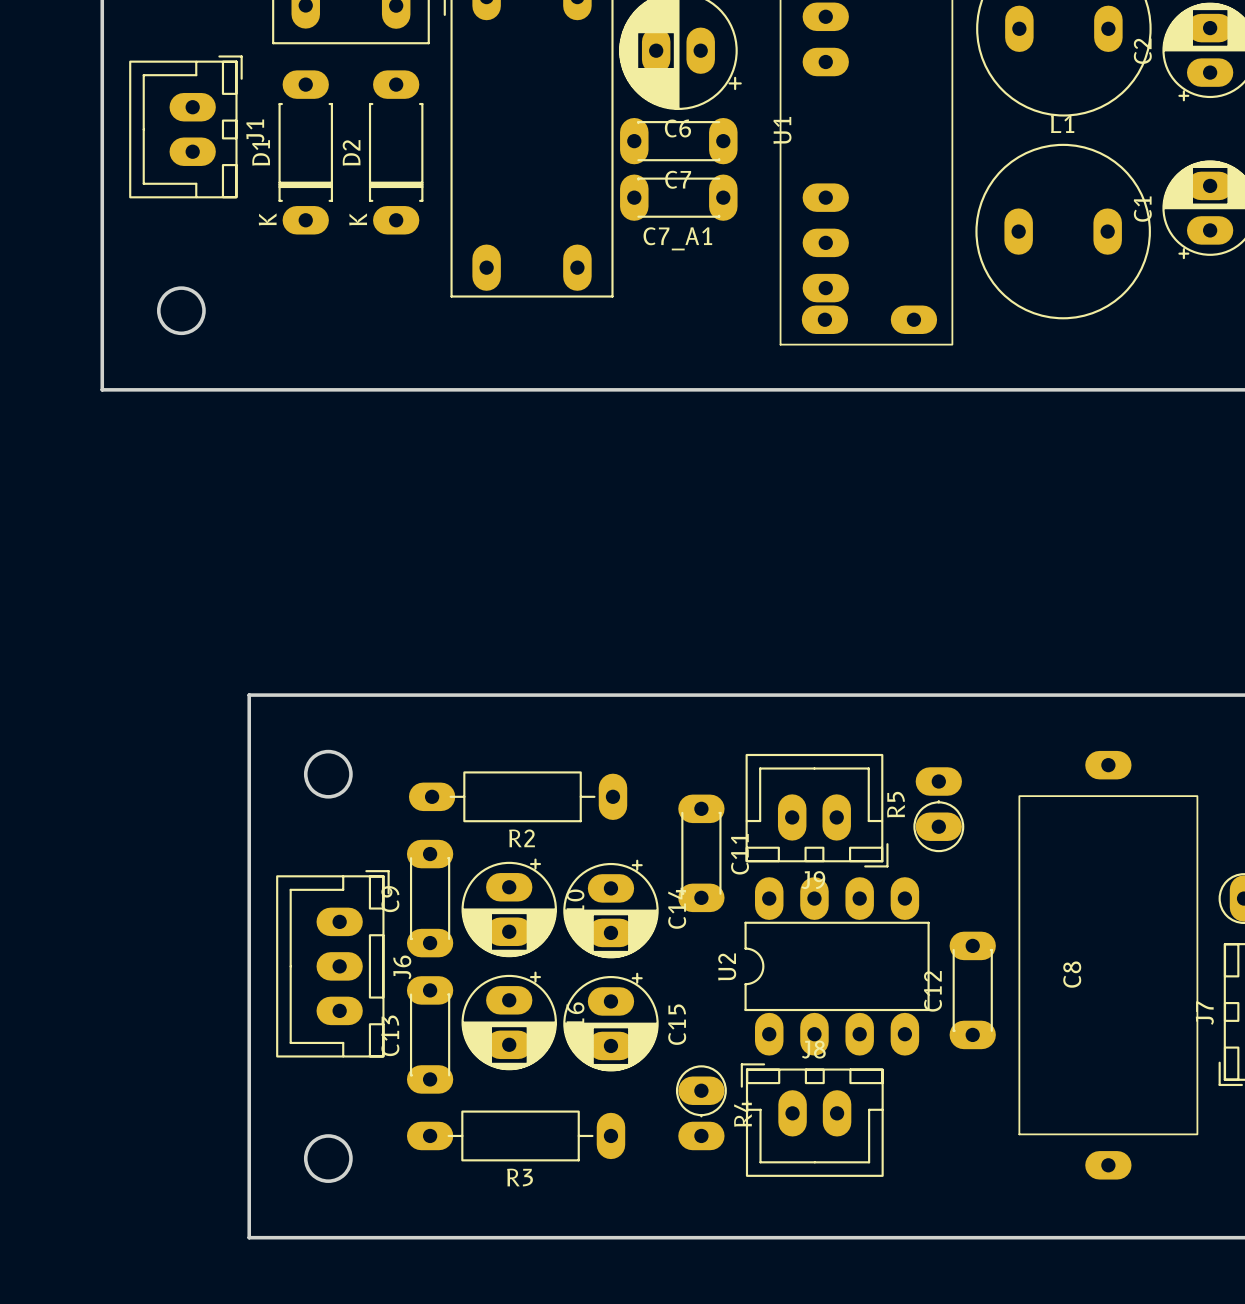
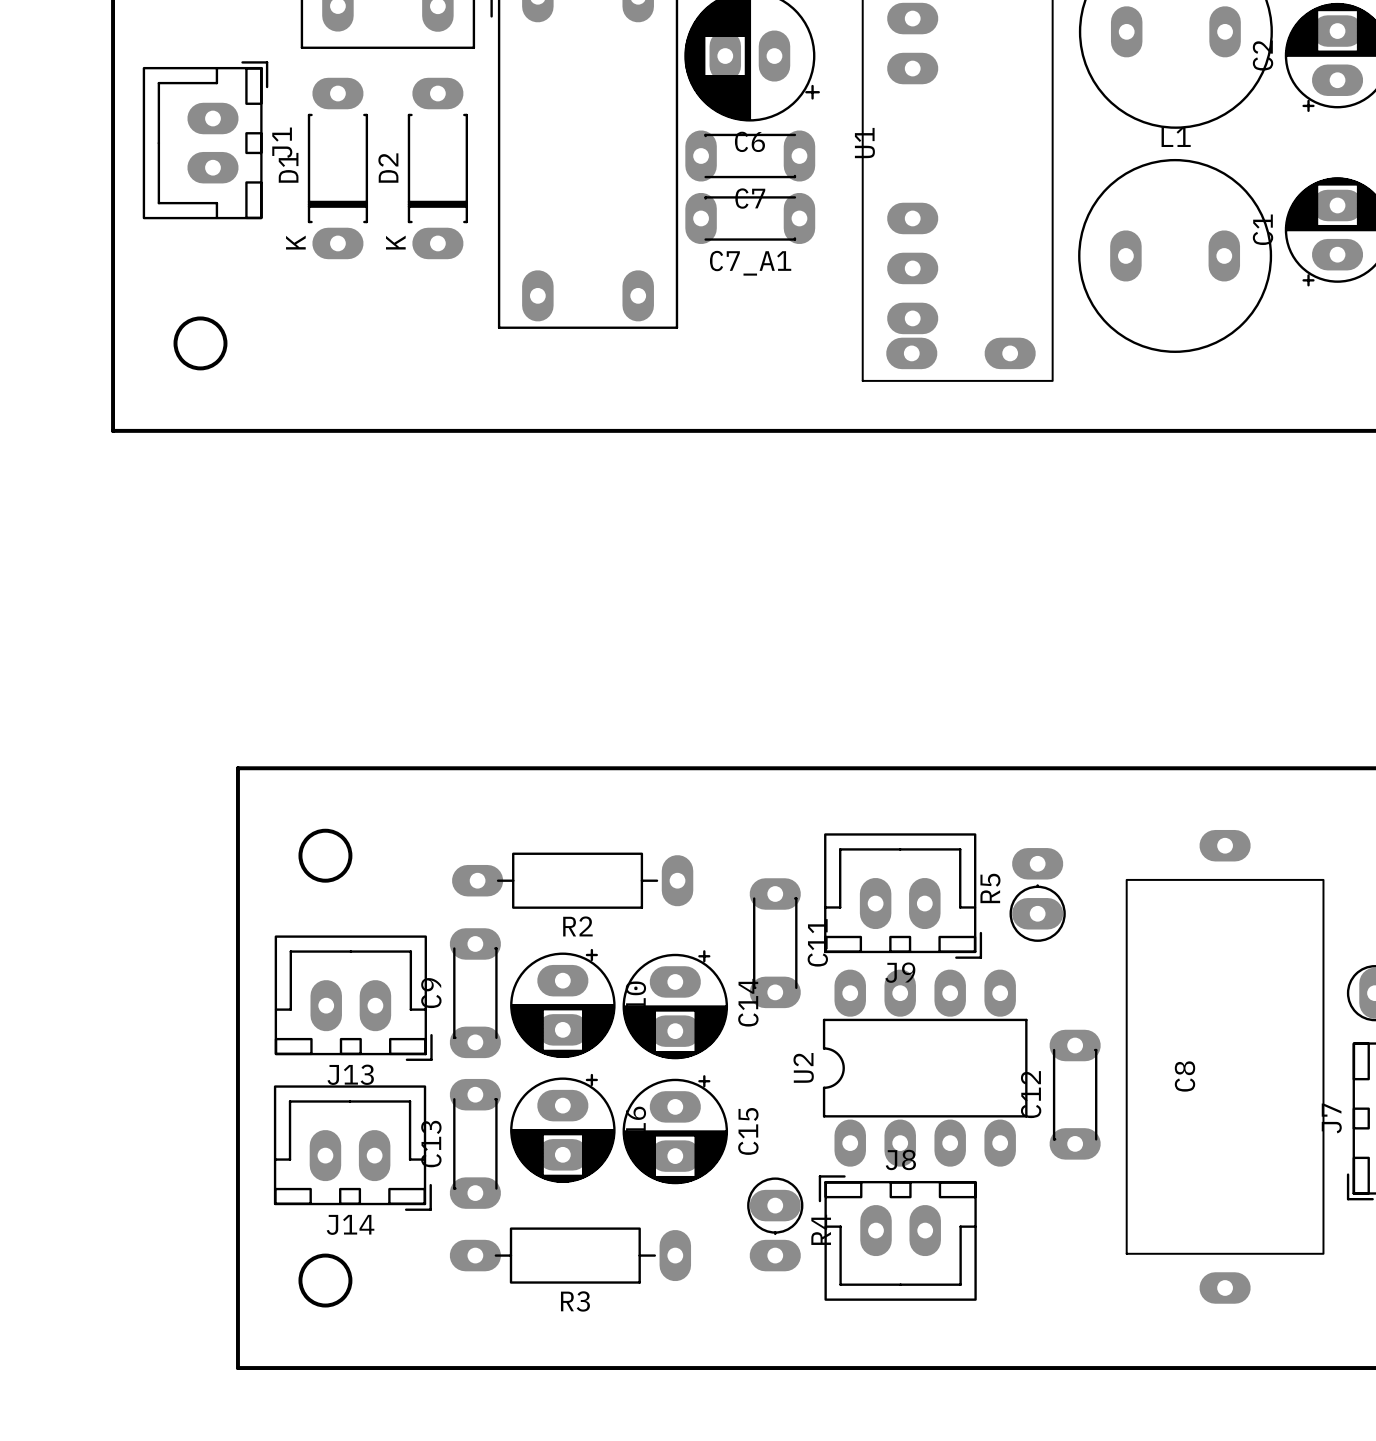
board edge: (249, 695) (249, 1237) -> (275, 768) (237, 768) (237, 1368) (275, 1368)
round board edge position: (328, 774) -> (325, 855)
J13: none -> (353, 998)
J6: (332, 963) -> none
J14: none -> (352, 1148)
round board edge position: (328, 1158) -> (325, 1280)

